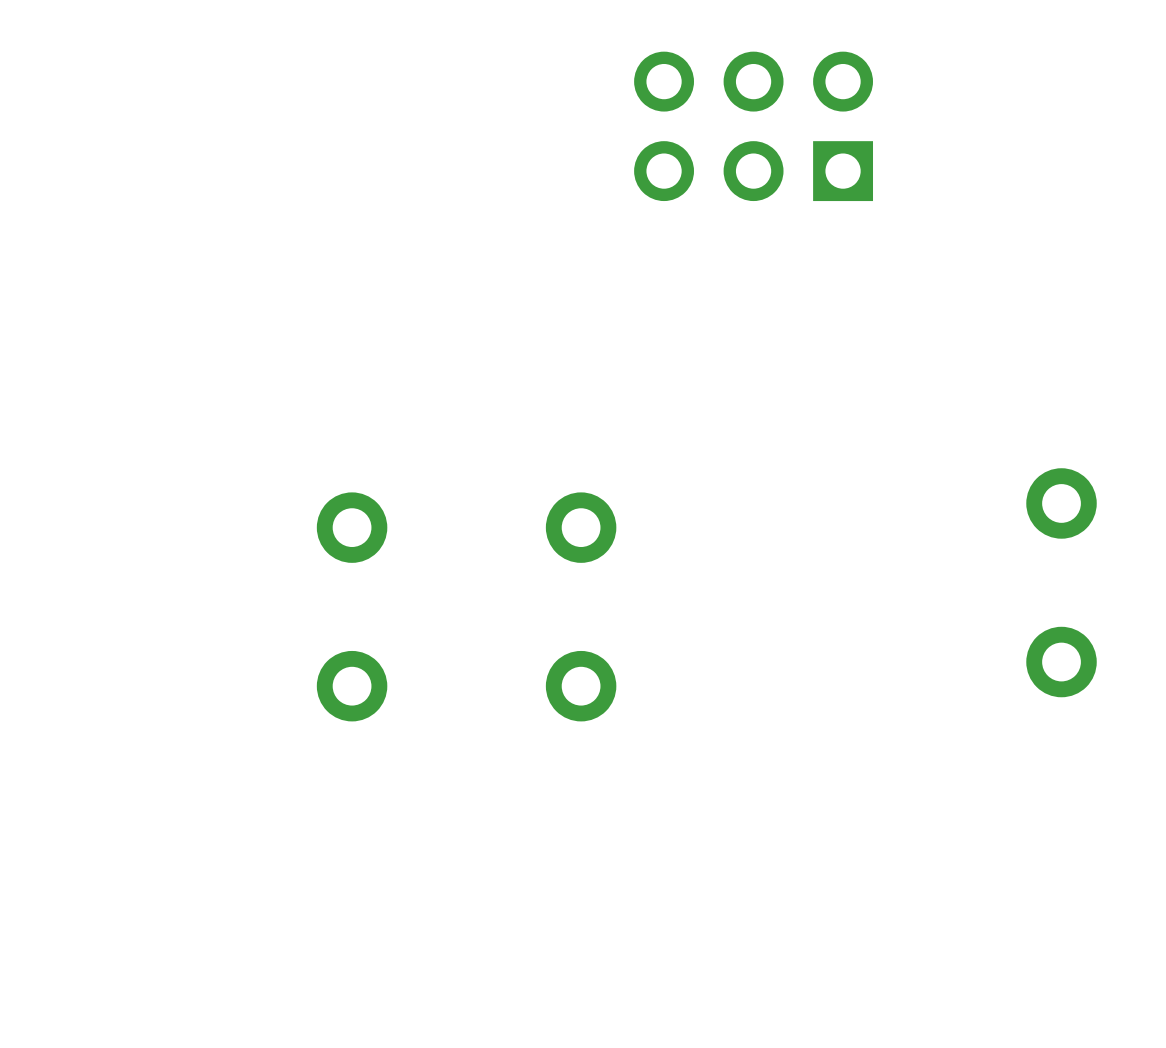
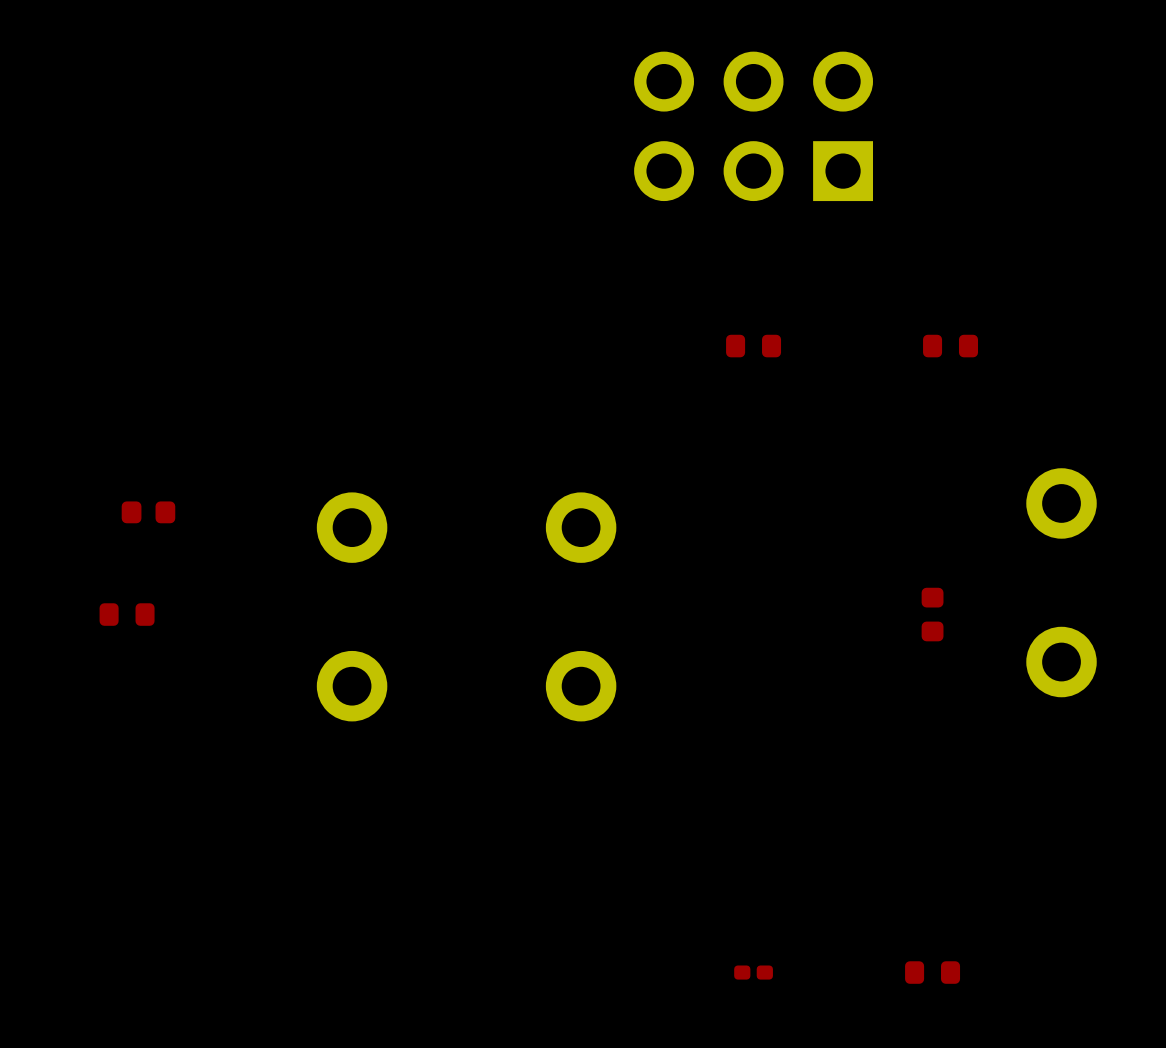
part: none -> (753, 346)
part: none -> (950, 346)
part: none -> (148, 512)
part: none -> (127, 614)
part: none -> (932, 614)
part: none -> (753, 972)
part: none -> (932, 972)

